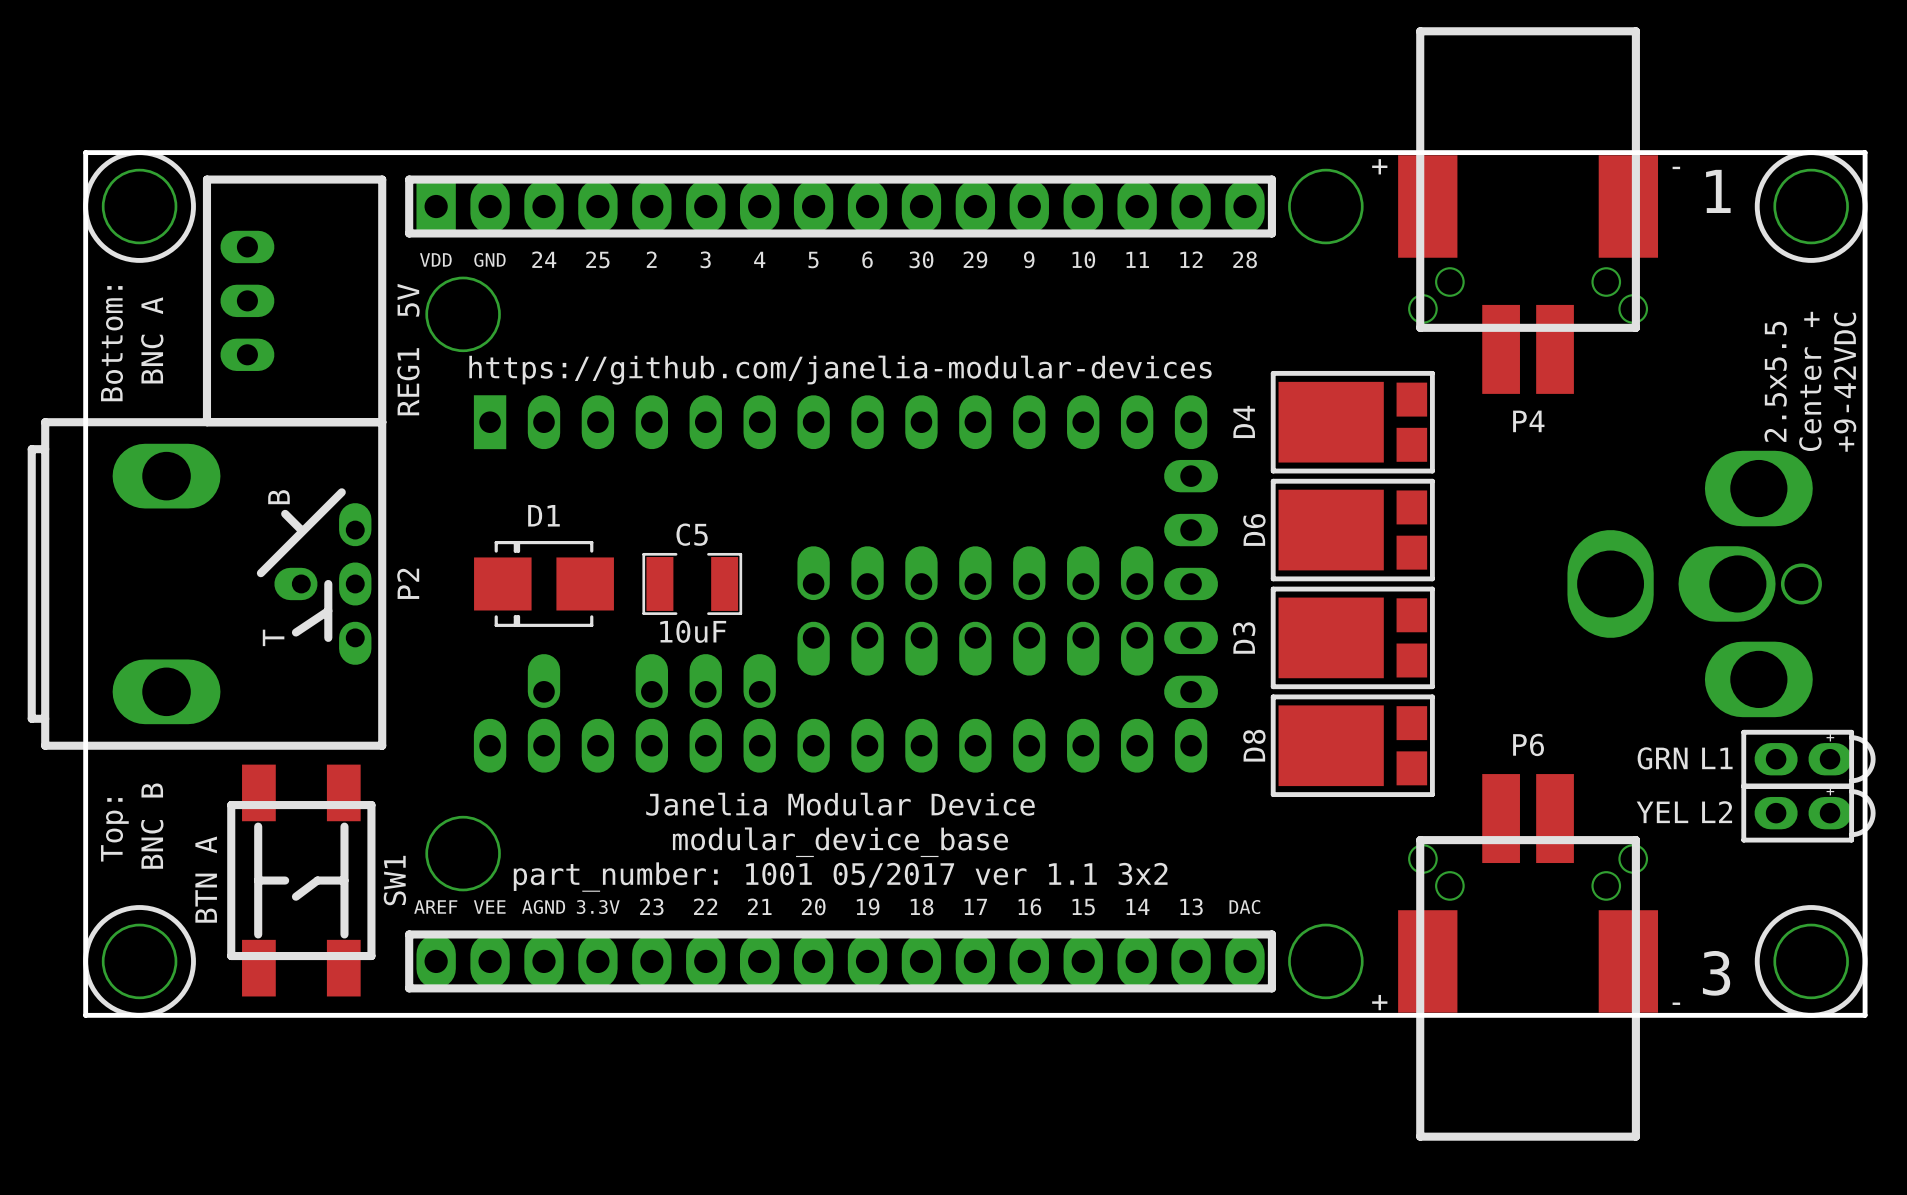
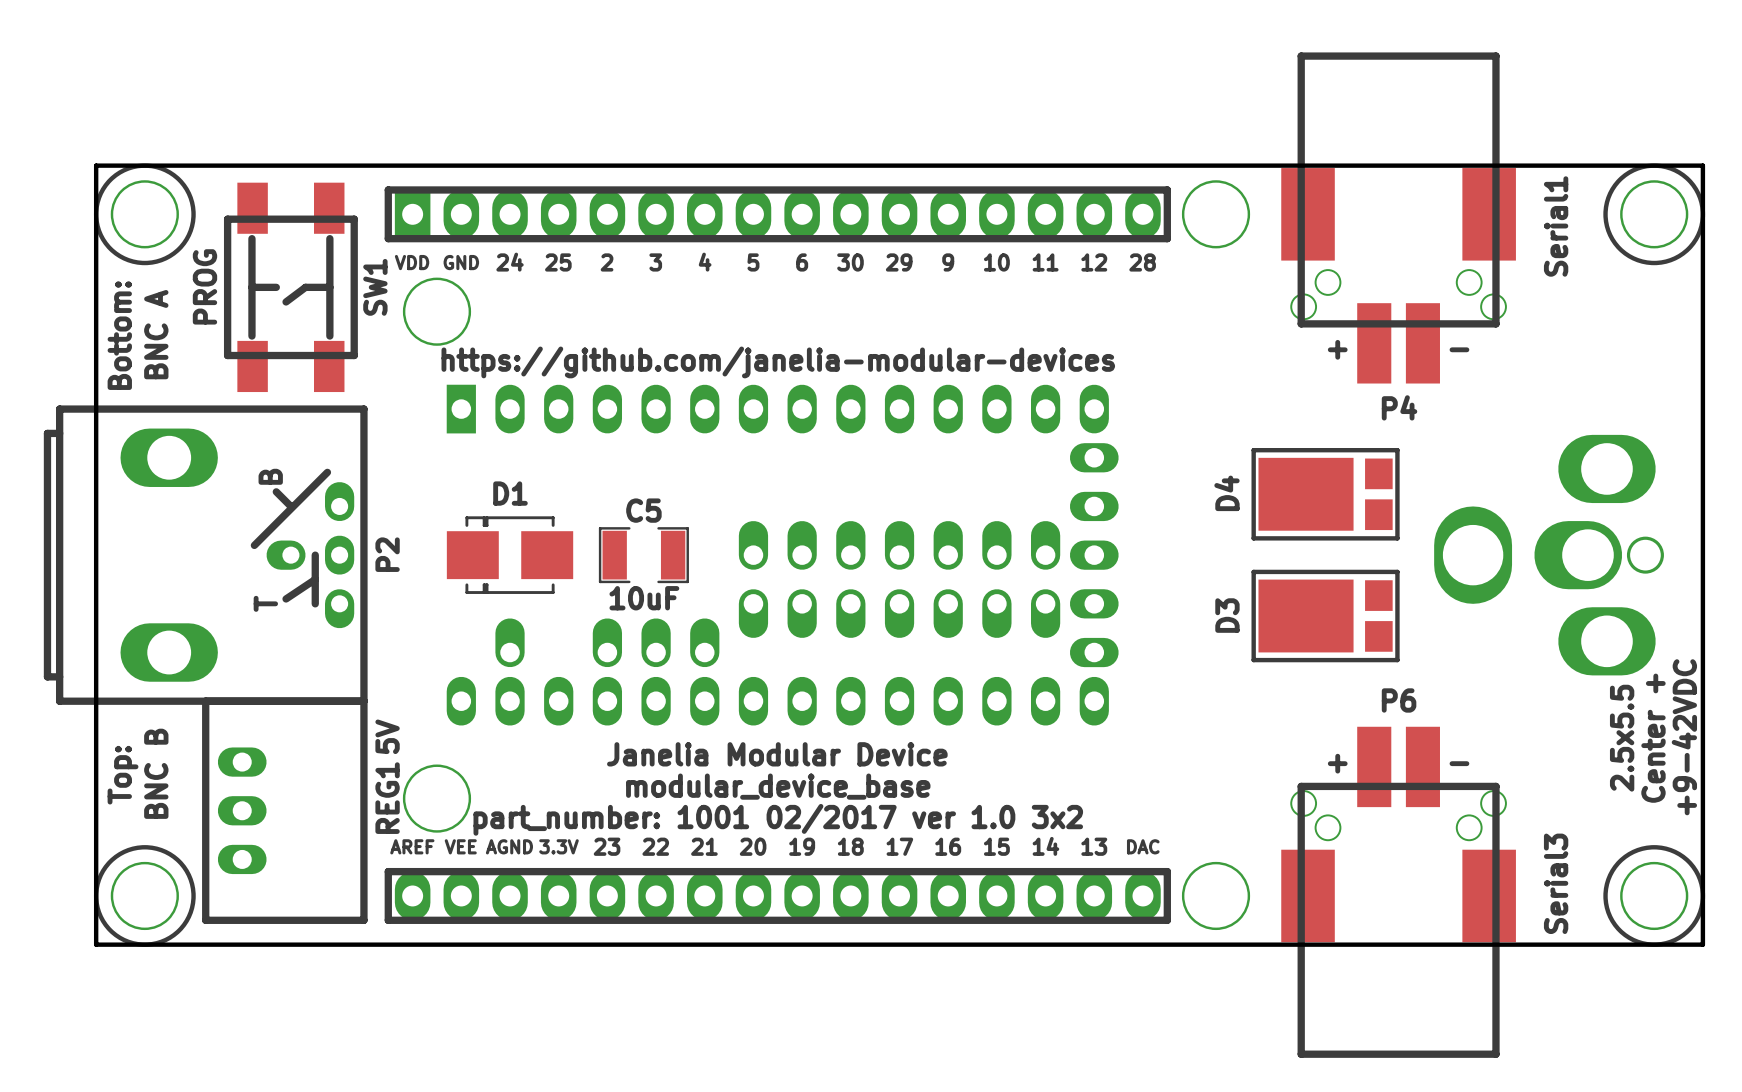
text position: + (1379, 166) -> + (1337, 349)
text position: - (1676, 167) -> - (1459, 349)
text: 1 (1718, 191) -> none
text: none -> Serial1 (1556, 226)
REG1 position: (294, 300) -> (284, 810)
text position: 5V (408, 300) -> 5V (387, 736)
REG1 name position: REG1 (408, 381) -> REG1 (387, 798)
text position: 2.5x5.5 (1775, 381) -> 2.5x5.5 (1622, 738)
text position: Center + (1810, 381) -> Center + (1653, 738)
text position: +9-42VDC (1845, 382) -> +9-42VDC (1684, 737)
D4 position: (1352, 422) -> (1325, 494)
D6: (1352, 530) -> none
D3 position: (1352, 637) -> (1325, 616)
D8: (1352, 745) -> none
text: GRN (1662, 758) -> none
L1: (1808, 759) -> none
text: YEL (1662, 812) -> none
L2: (1808, 813) -> none
text: part_number: 1001 05/2017 ver 1.1 3x2 (840, 877) -> part_number: 1001 02/2017 ver 1.0 3x2 (778, 819)
SW1 text: BTN A (206, 879) -> PROG (204, 286)
SW1 position: (301, 880) -> (290, 287)
text: none -> Serial3 (1556, 883)
text: 3 (1716, 973) -> none
text position: + (1379, 1002) -> + (1337, 763)
text position: - (1676, 1003) -> - (1459, 763)

